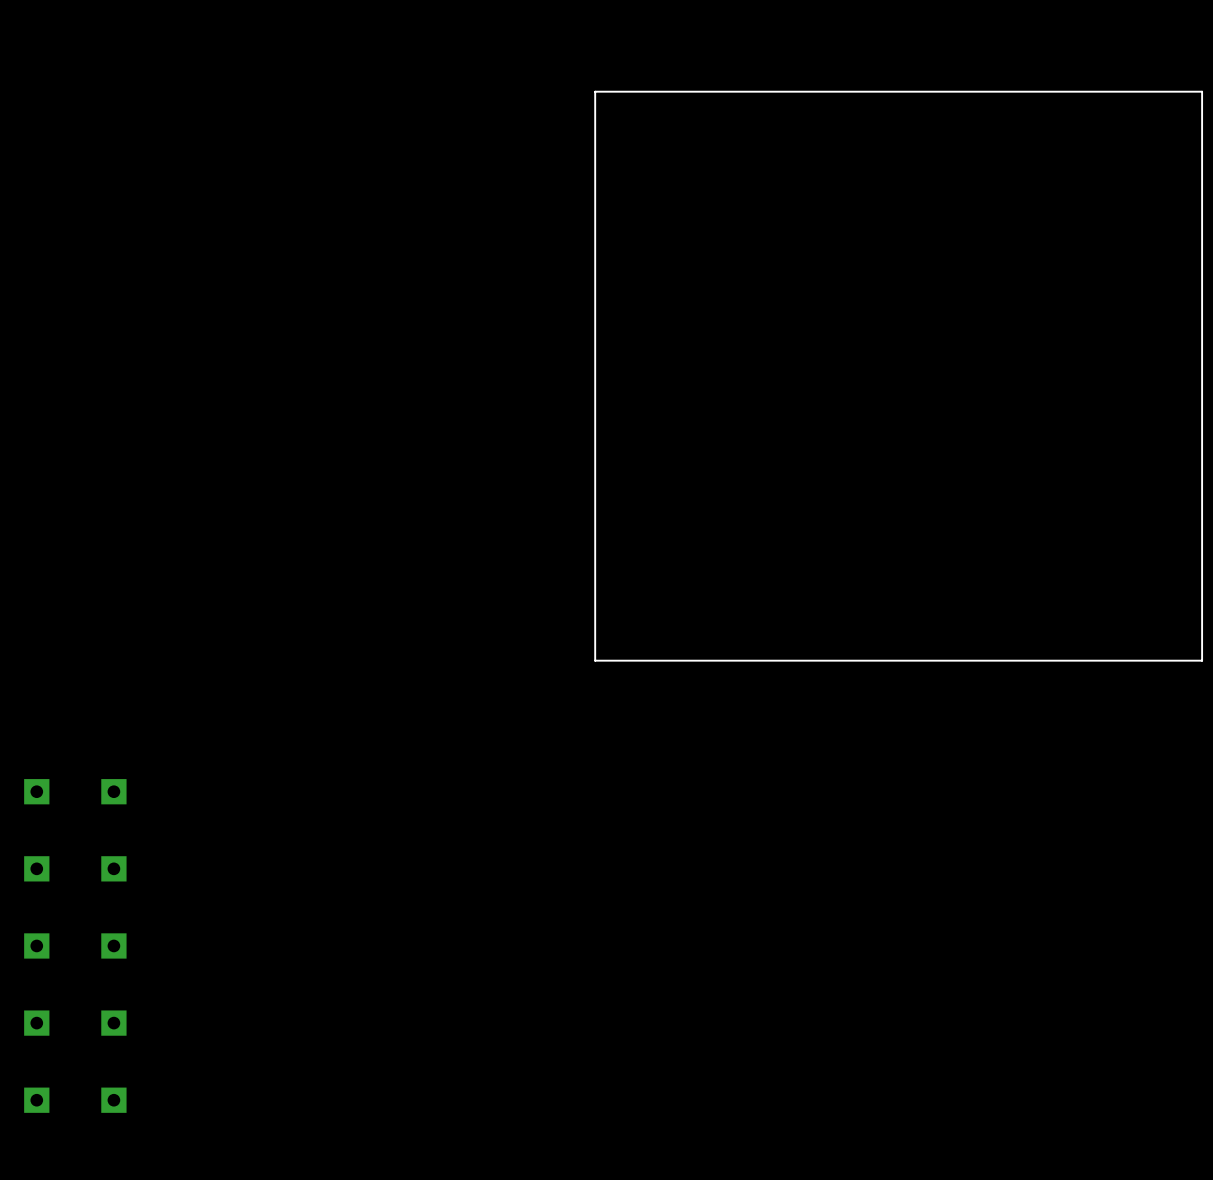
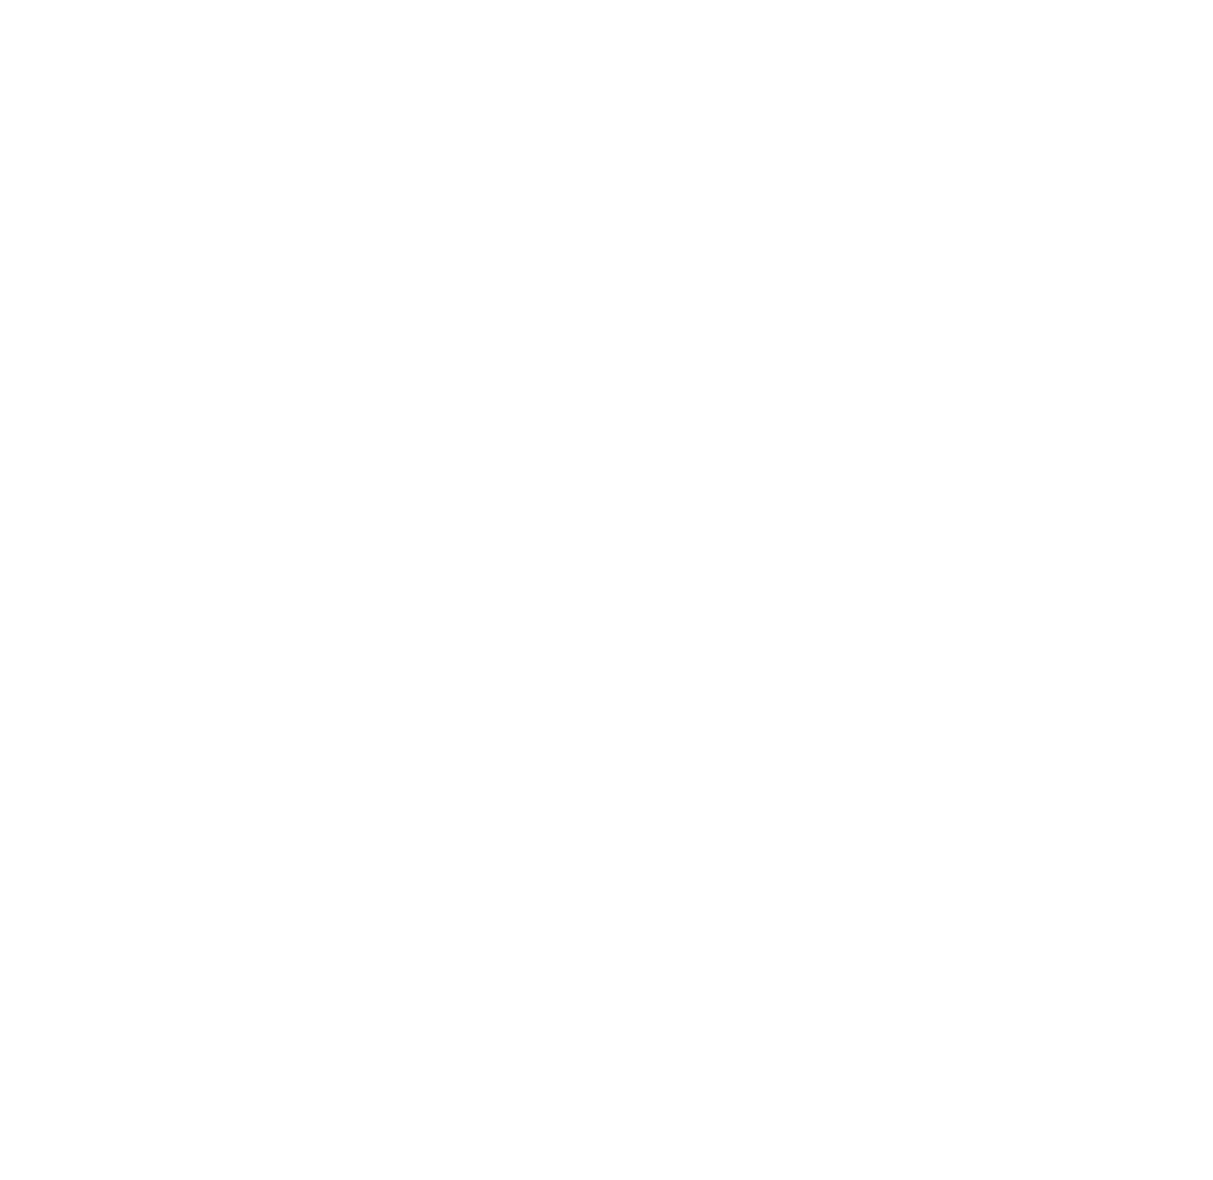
board edge: (1202, 91) (595, 91) (595, 660) (1202, 660) (1202, 91) -> none
part: (36, 791) -> none
part: (113, 791) -> none
part: (36, 868) -> none
part: (113, 868) -> none
part: (36, 945) -> none
part: (113, 945) -> none
part: (36, 1023) -> none
part: (113, 1023) -> none
part: (36, 1100) -> none
part: (113, 1100) -> none

